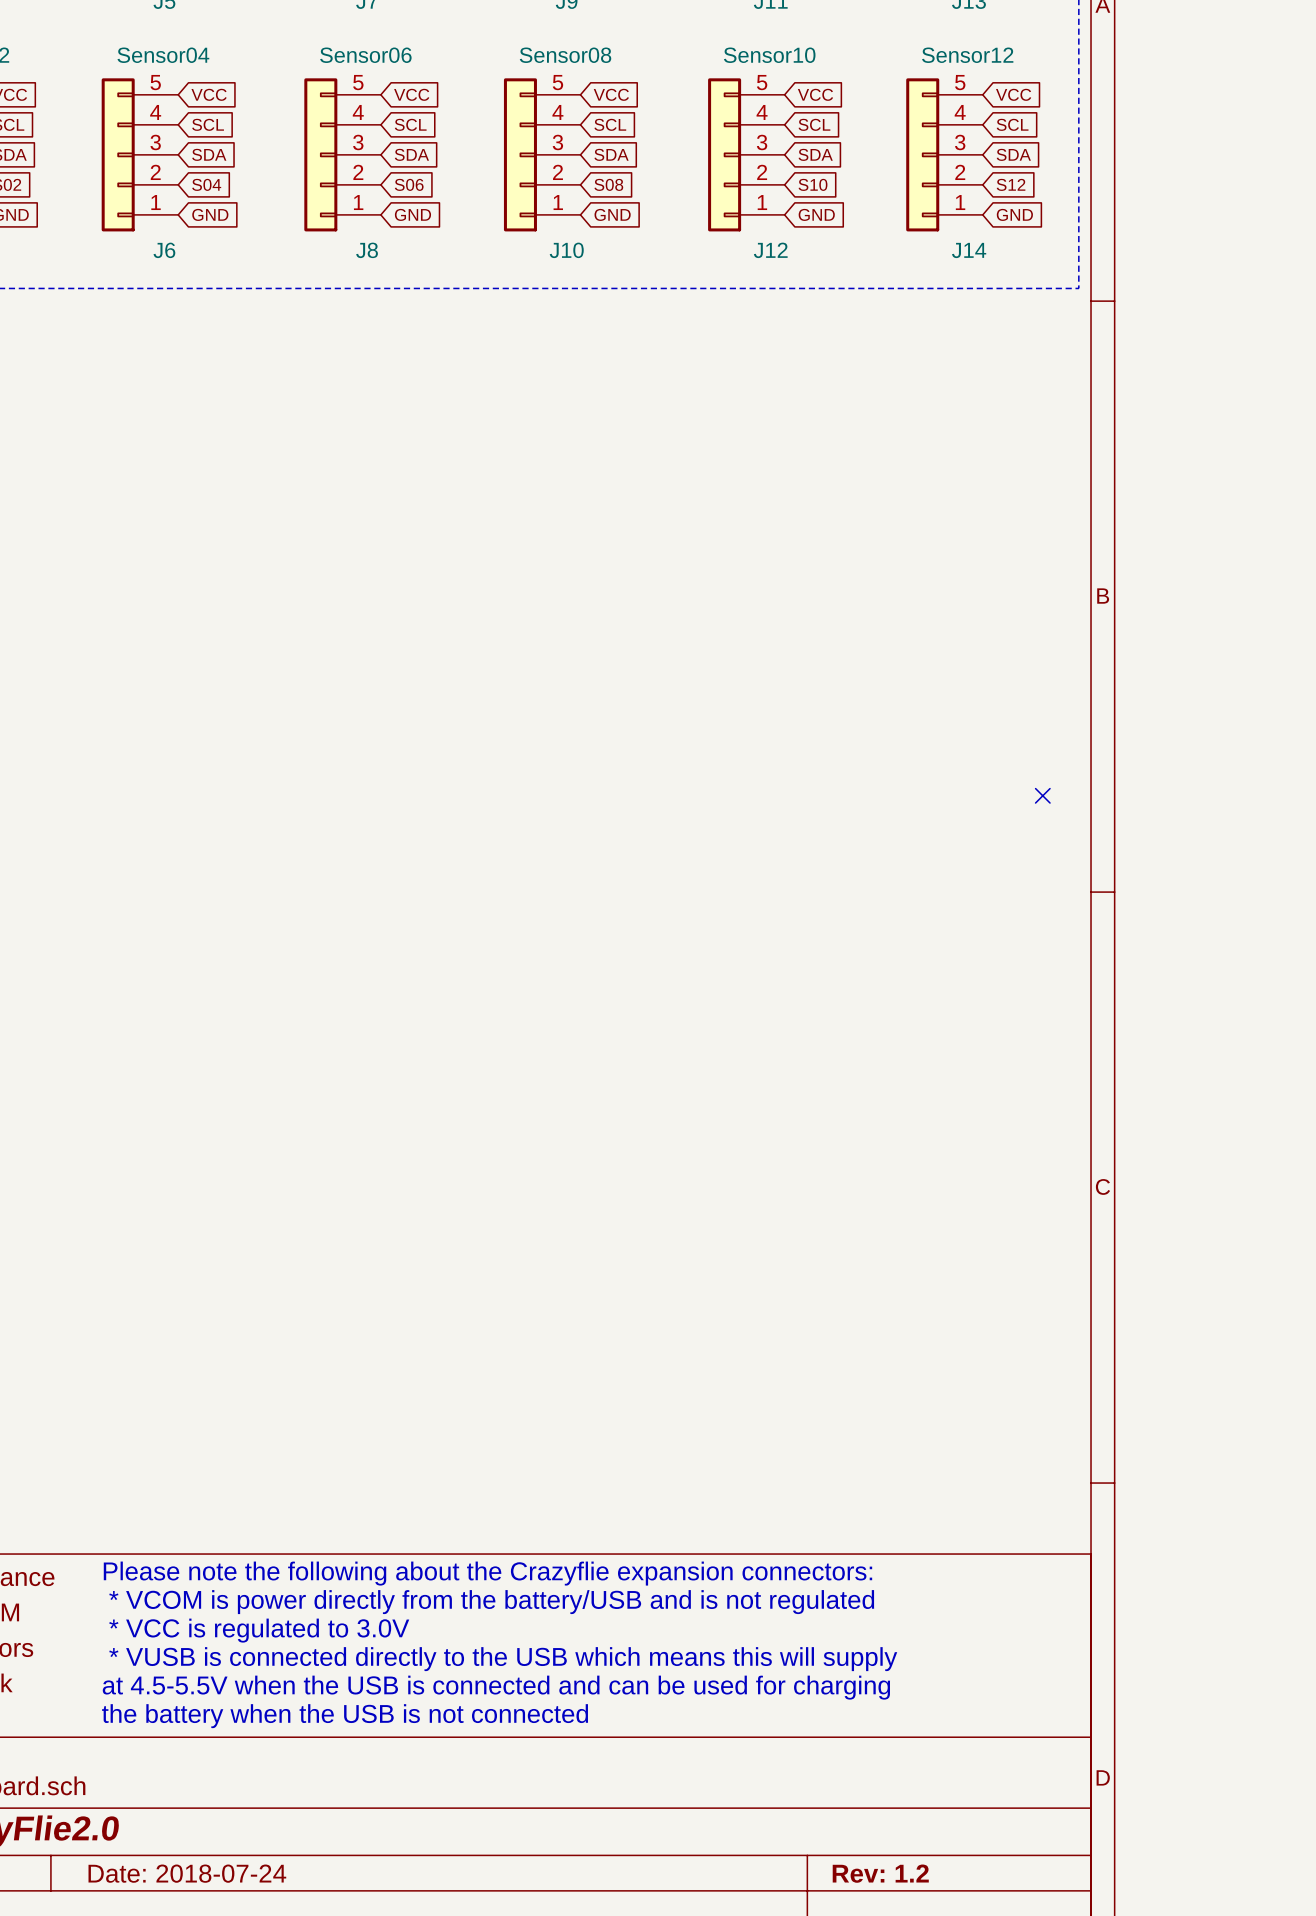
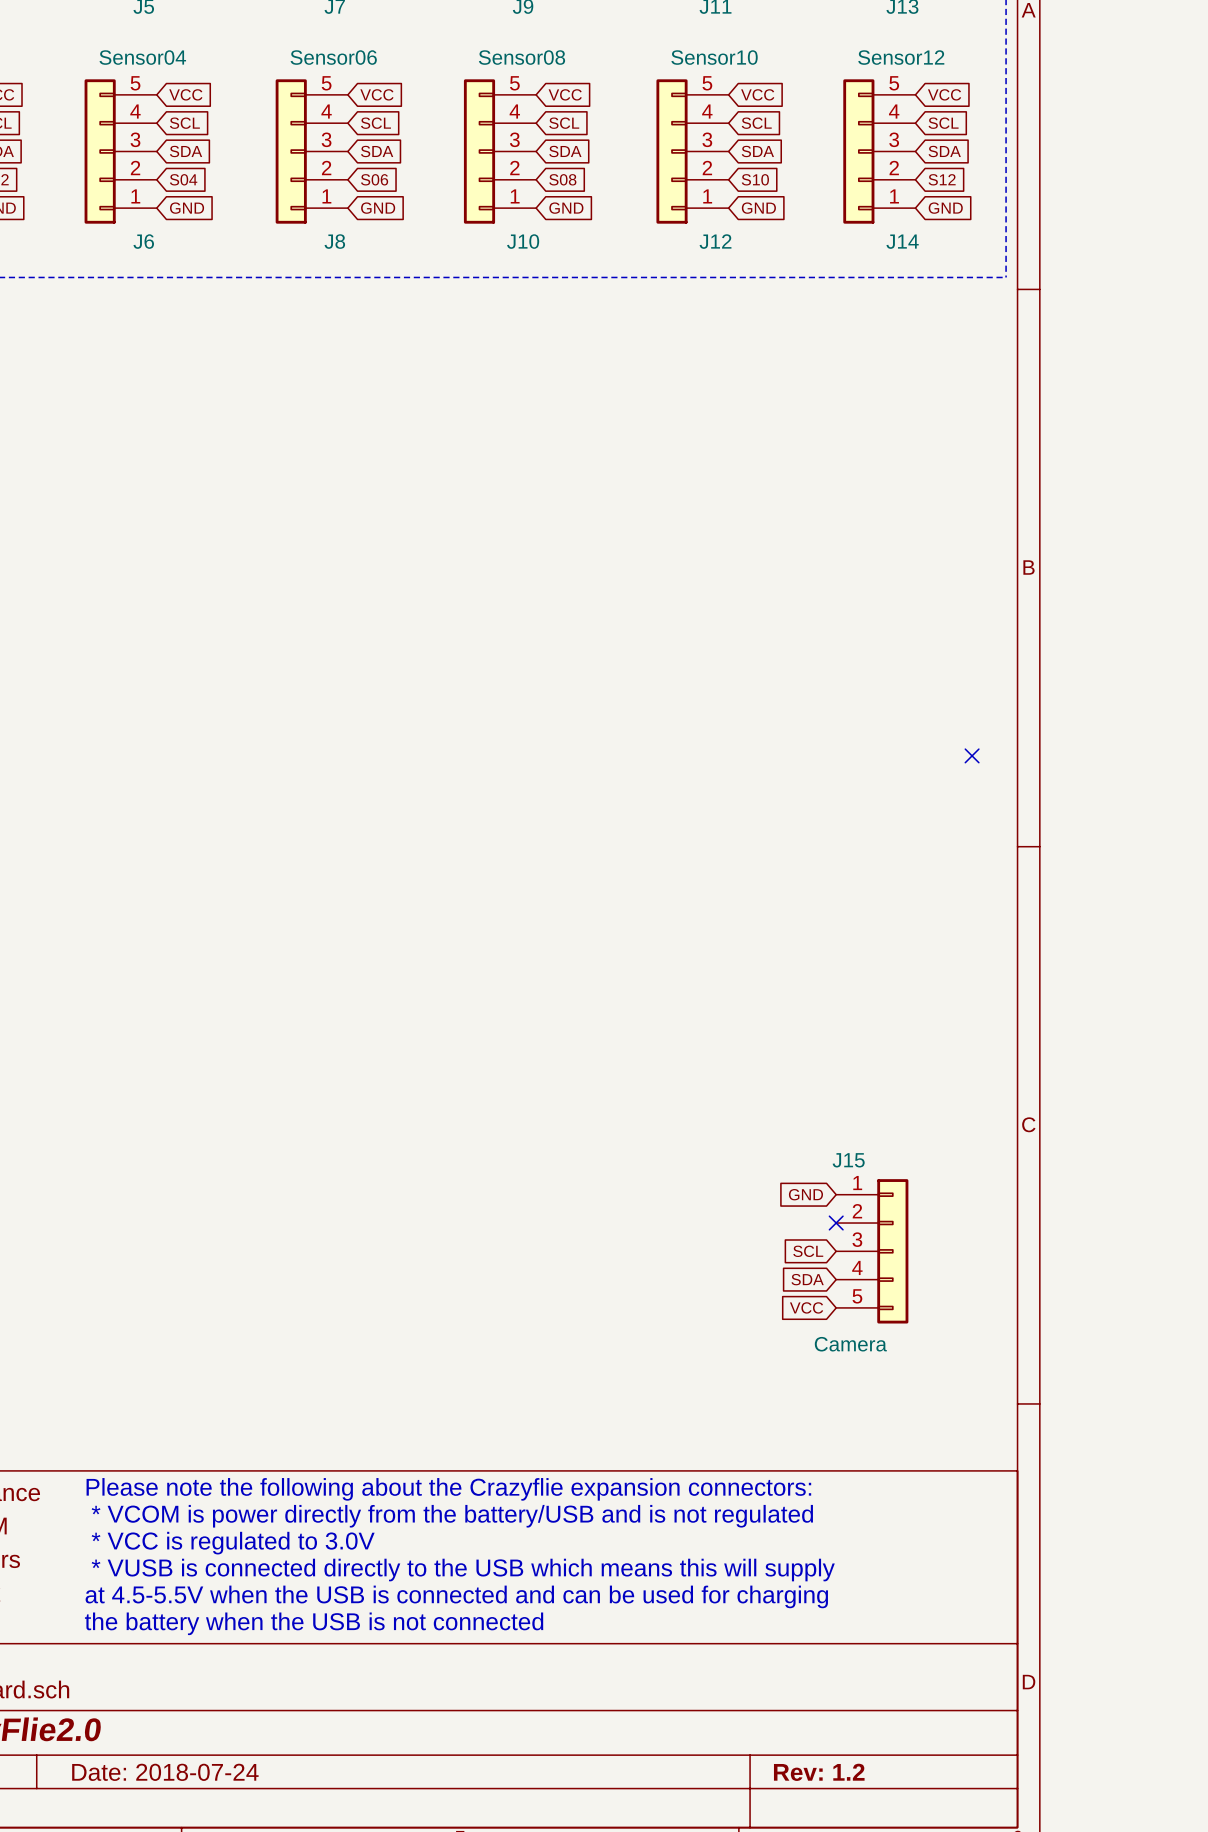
global label: none -> GND (805, 1194)
no-connect mark: none -> (836, 1223)
global label: none -> SCL (808, 1251)
J15: none -> Camera (872, 1251)
global label: none -> SDA (807, 1279)
global label: none -> VCC (806, 1307)

